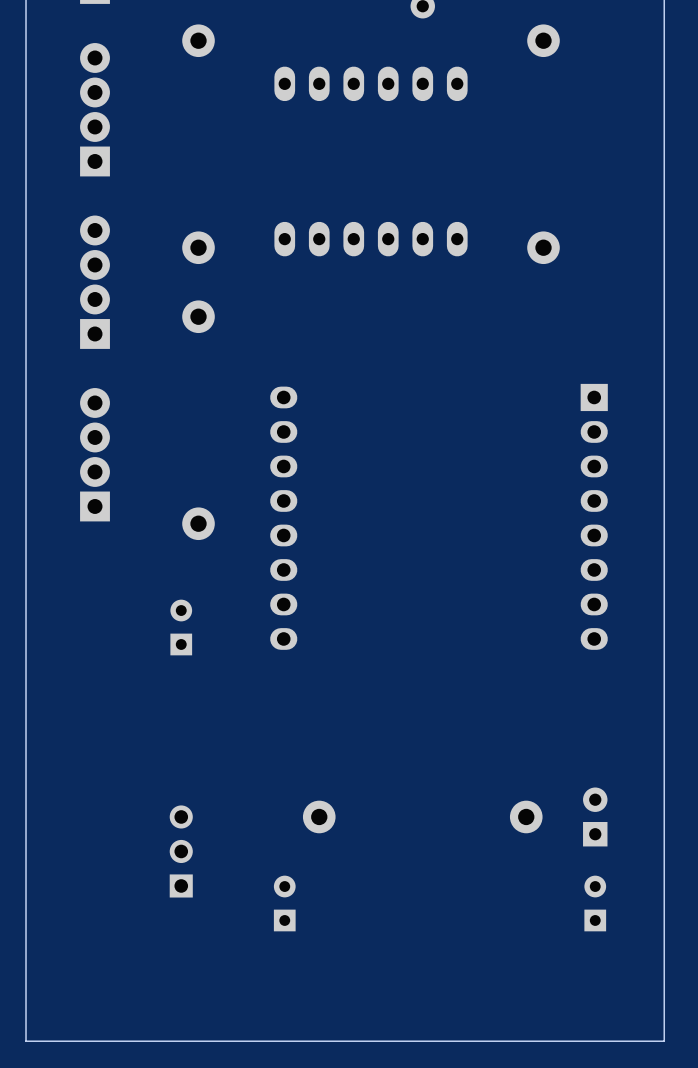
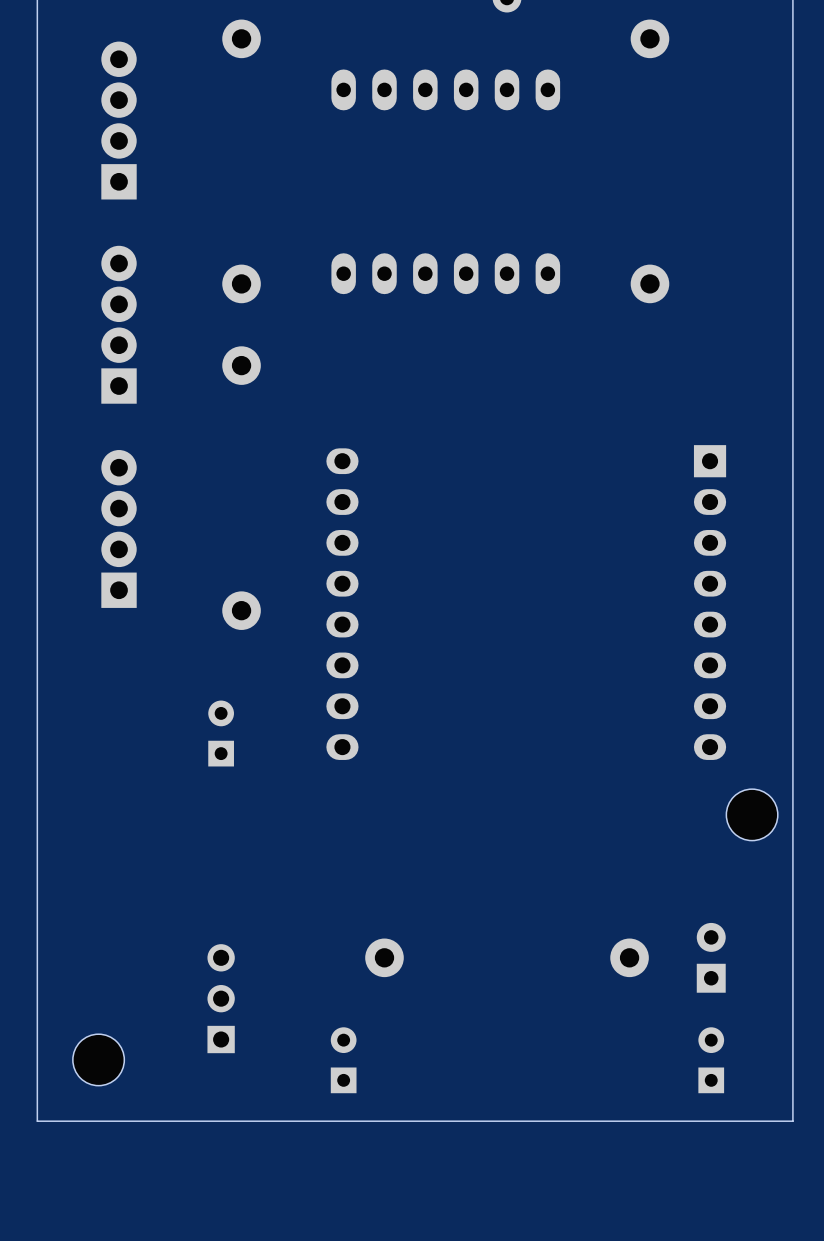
part: none -> (752, 814)
part: none -> (98, 1059)
board edge: (664, 954) (664, 1041) (26, 1041) (26, 954) -> (792, 1121) (37, 1121)

